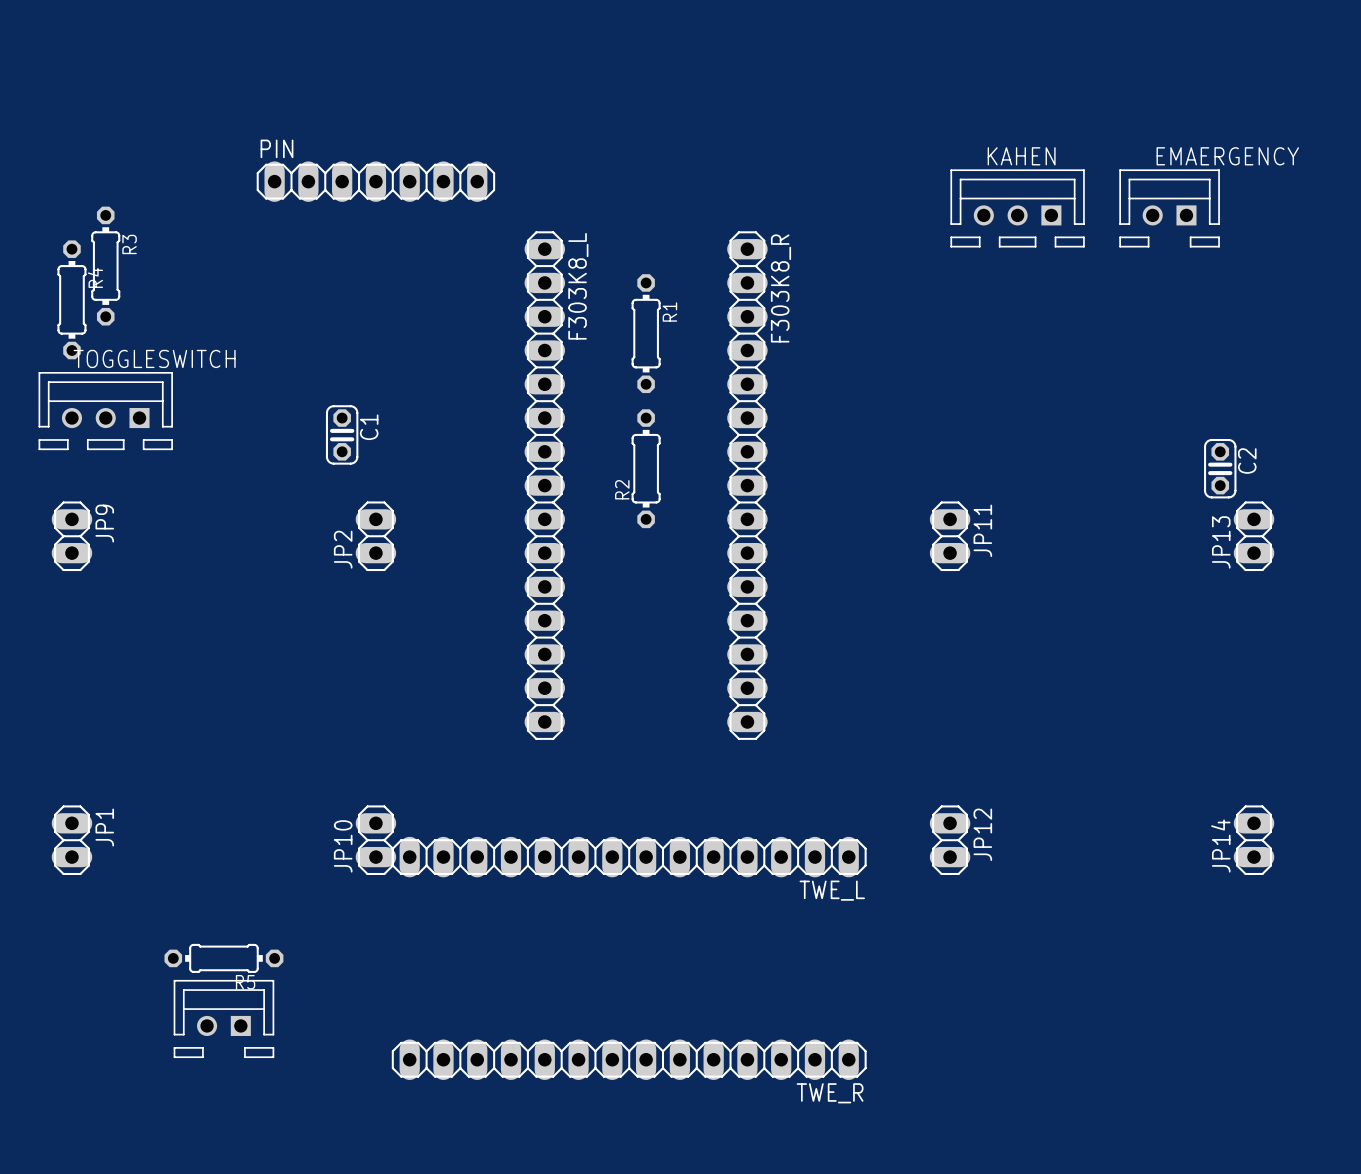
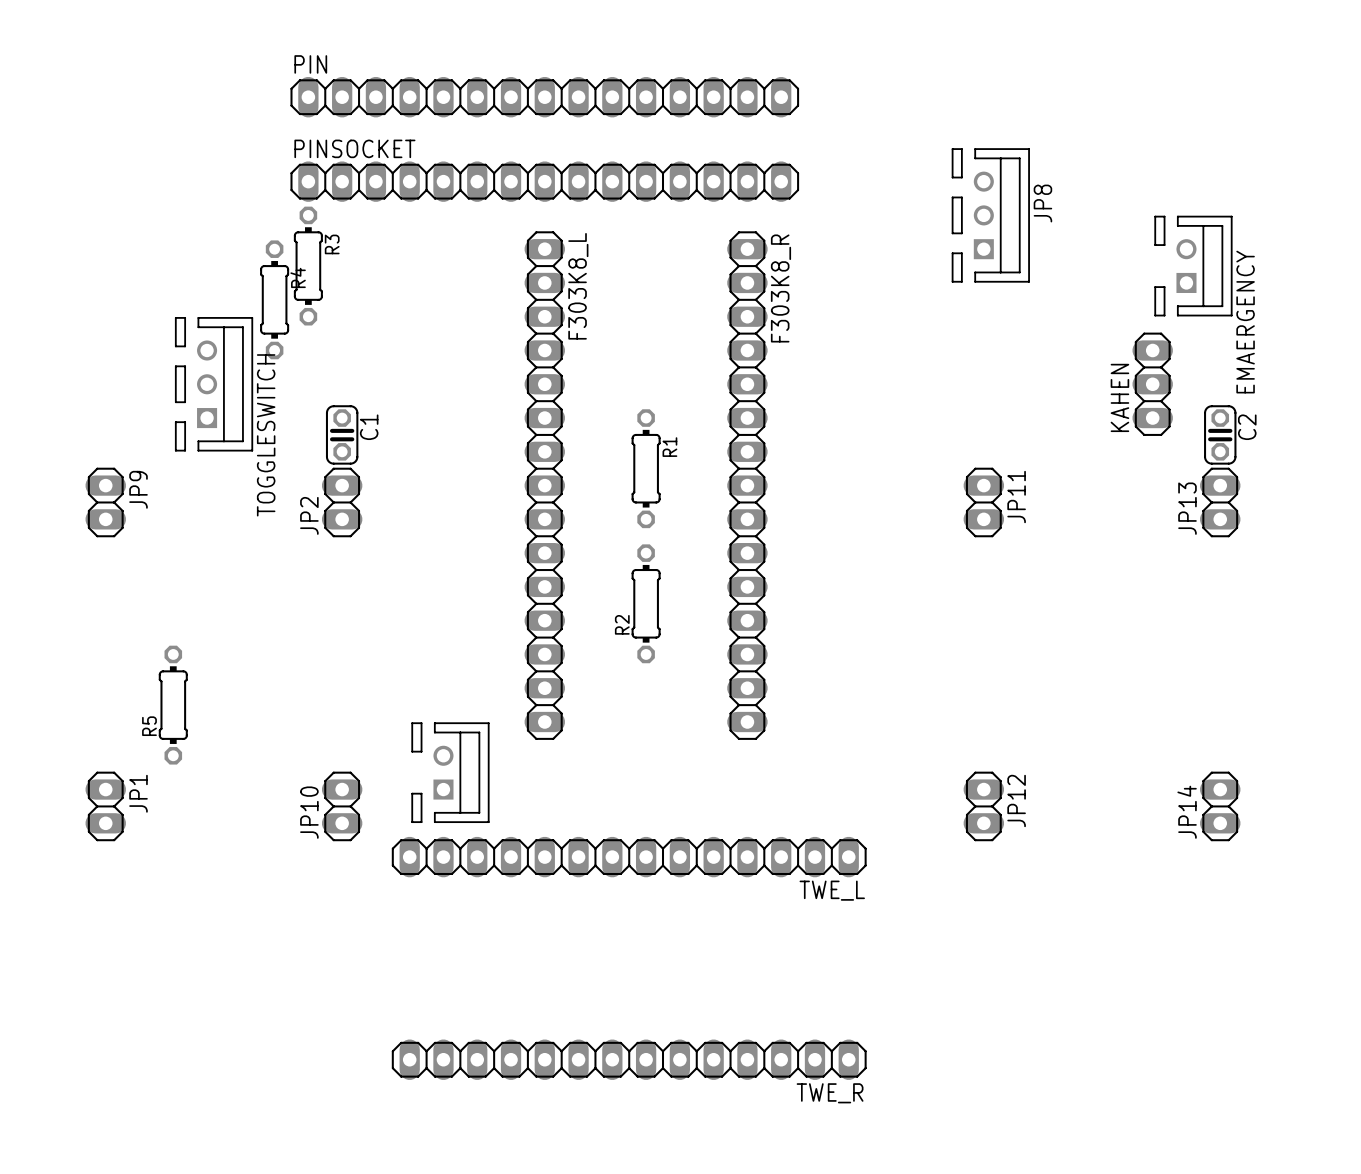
PIN: none -> (544, 97)
PIN: (375, 181) -> none
PINSOCKET: none -> (544, 181)
KAHEN: (1017, 208) -> none
EMAERGENCY rotation: 0° (1169, 208) -> 90° clockwise (1193, 266)
EMAERGENCY position: (1169, 208) -> (1193, 266)
JP8: none -> (990, 215)
R3 position: (105, 266) -> (308, 266)
R4 position: (71, 299) -> (274, 299)
R1: (646, 333) -> none
KAHEN: none -> (1152, 384)
TOGGLESWITCH rotation: 0° (105, 411) -> 90° clockwise (214, 384)
TOGGLESWITCH position: (105, 411) -> (214, 384)
C2 position: (1220, 468) -> (1220, 434)
R2 name: R2 (622, 489) -> R1 (669, 447)
JP9 position: (71, 536) -> (105, 502)
JP2 position: (375, 536) -> (342, 502)
JP11 position: (950, 536) -> (983, 502)
JP13 position: (1254, 536) -> (1220, 502)
R2: none -> (646, 603)
part: none -> (450, 772)
JP1 position: (71, 840) -> (105, 806)
JP10 position: (375, 840) -> (342, 806)
JP12 position: (950, 840) -> (983, 806)
JP14 position: (1254, 840) -> (1220, 806)
R5 rotation: 0° (223, 958) -> 90° clockwise (173, 705)
R5 position: (223, 958) -> (173, 705)
part: (223, 1018) -> none

